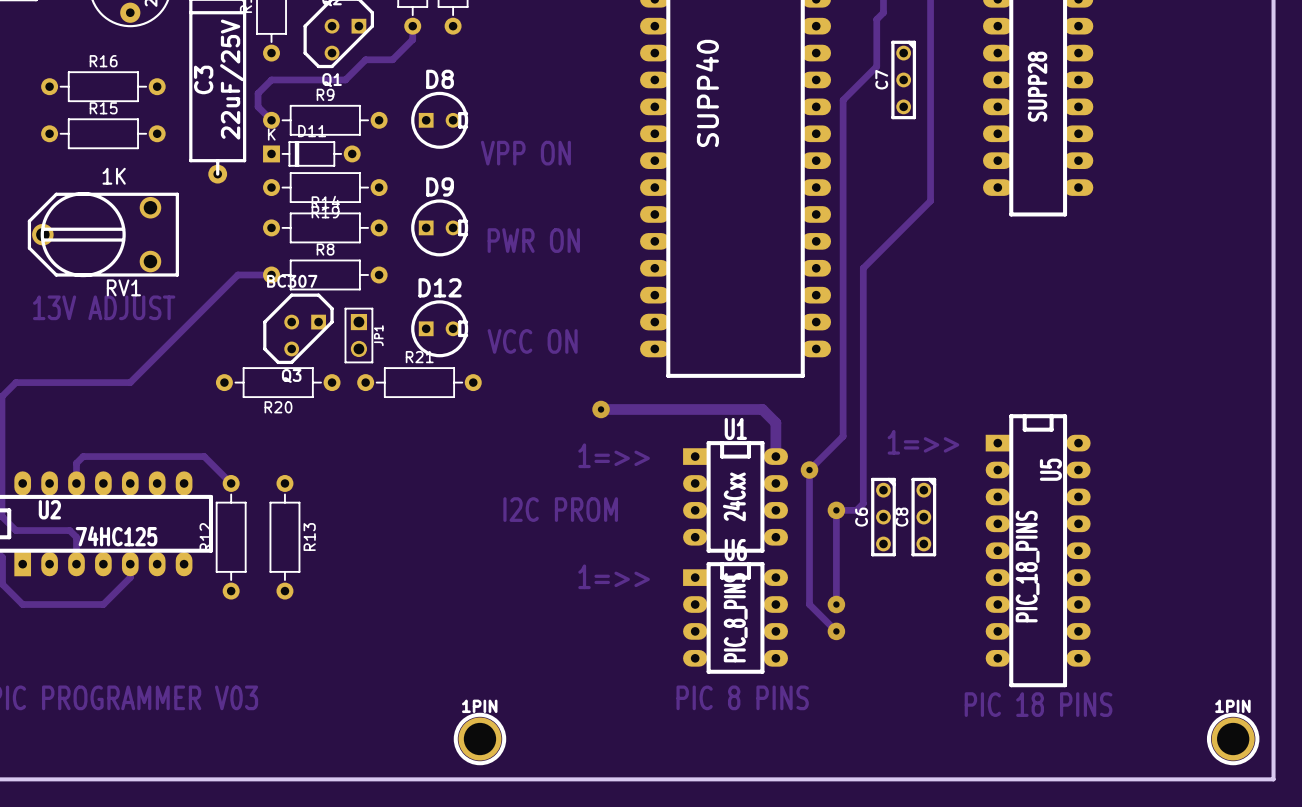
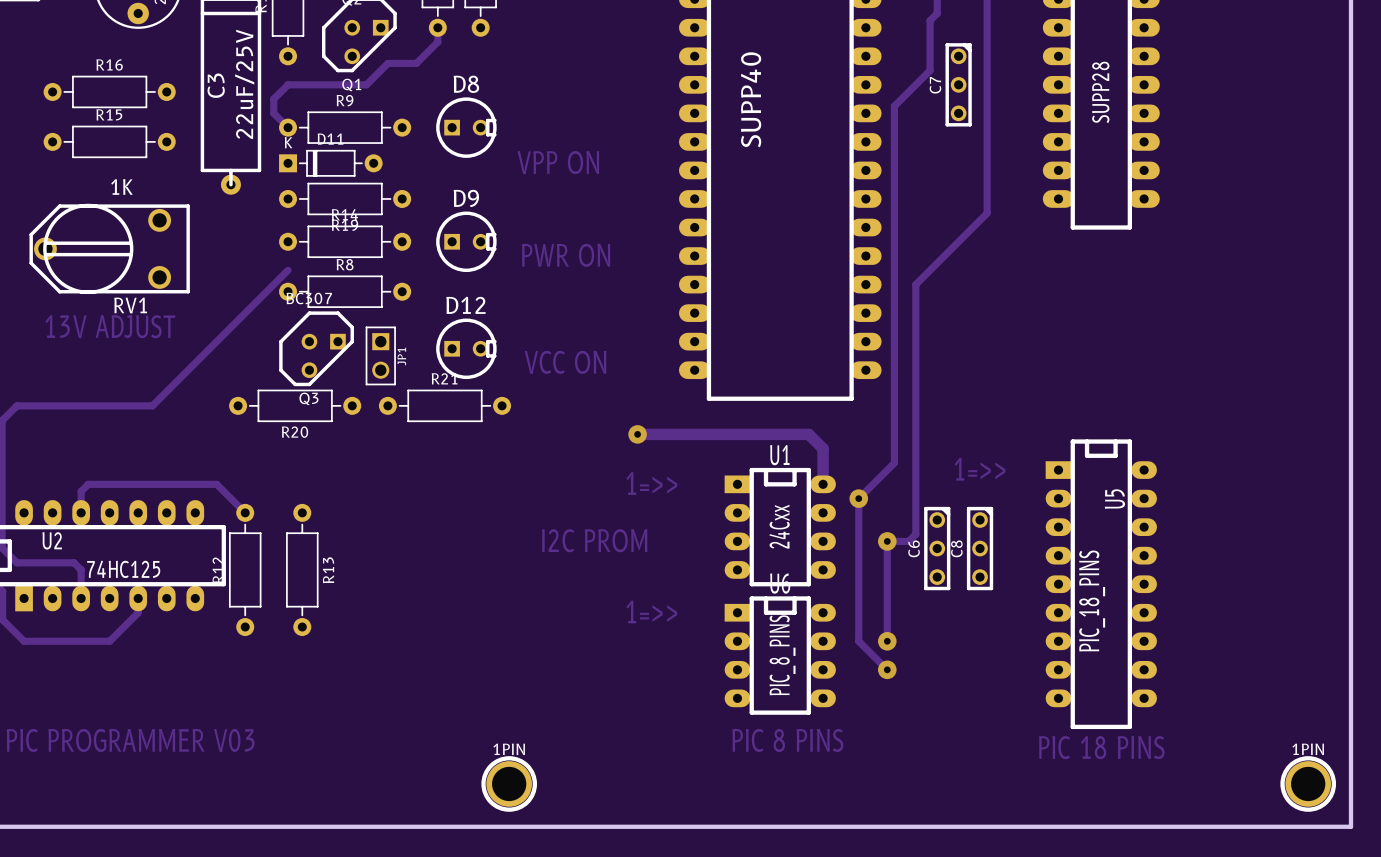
track: (271, 274) (237, 274) (130, 382) -> (288, 270) (152, 405) (138, 405)

